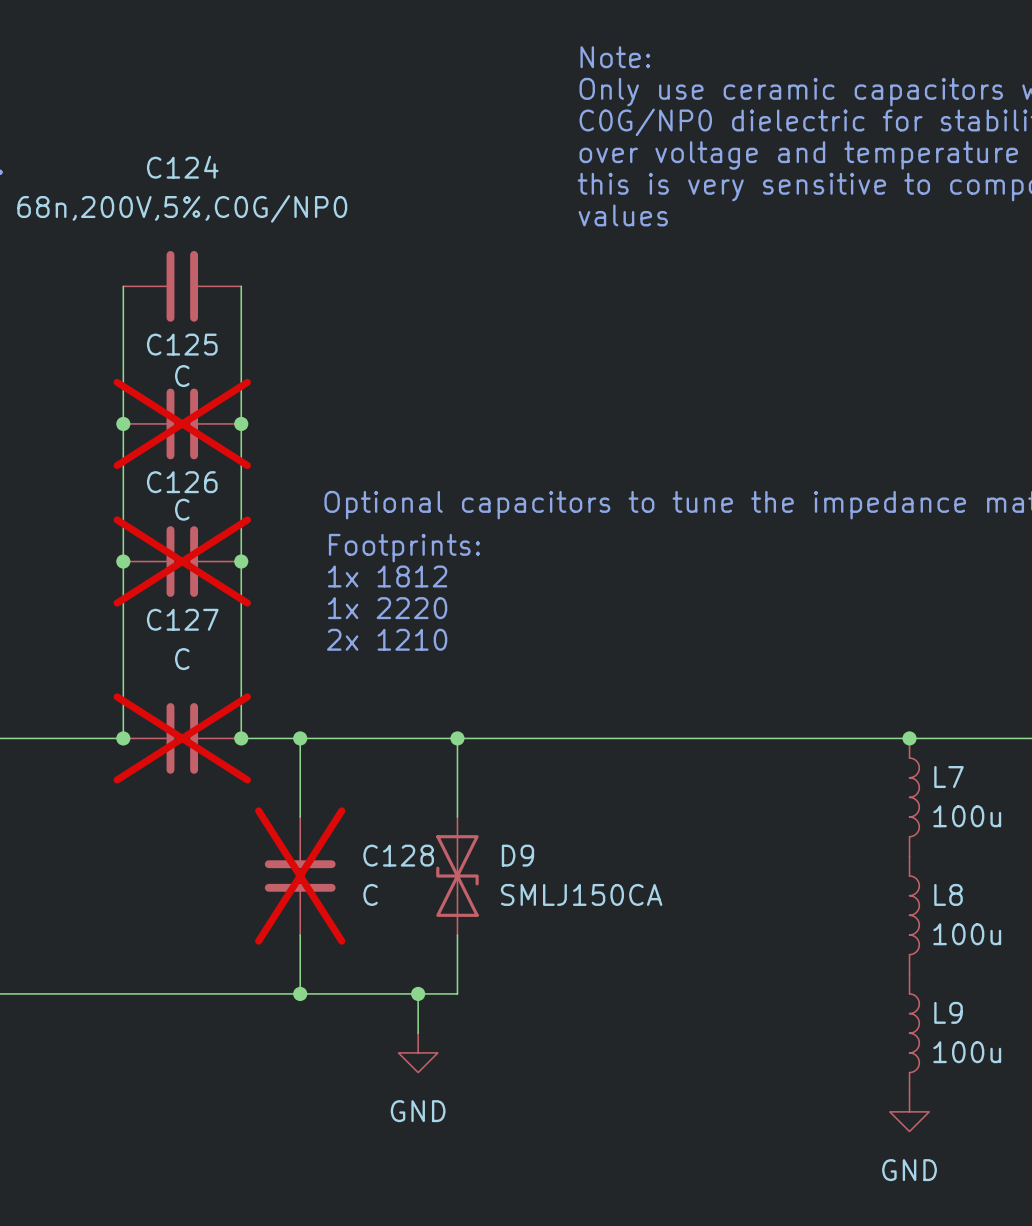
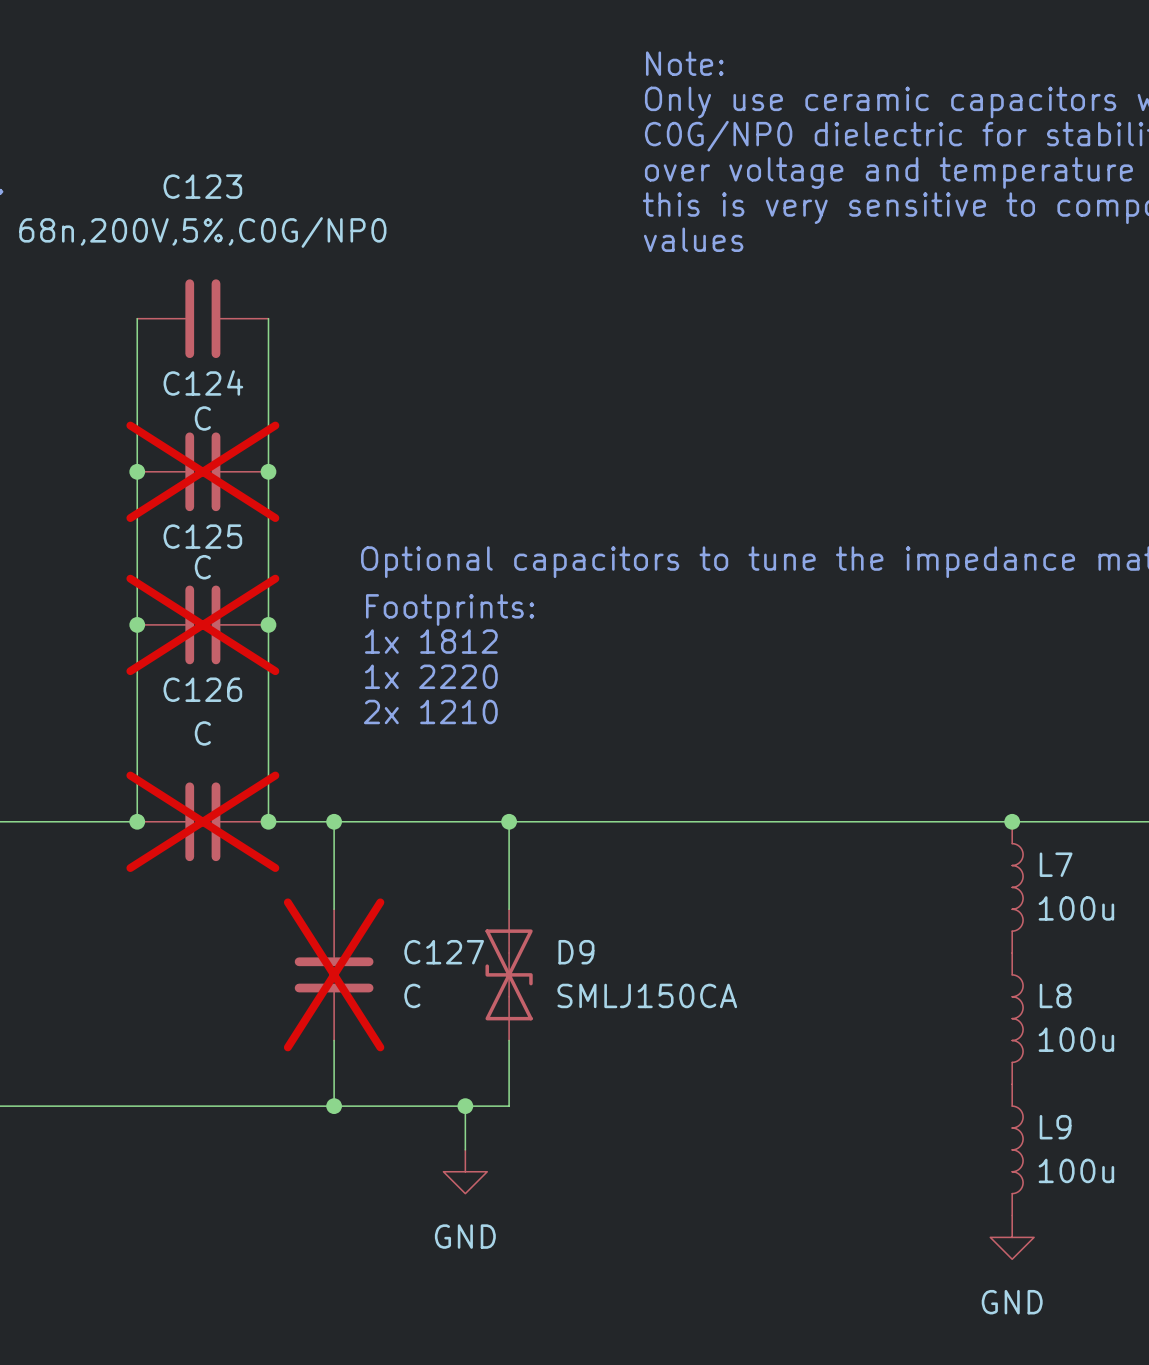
C124 name: C124 (182, 167) -> C123 (202, 186)
C125 name: C125 (182, 344) -> C124 (203, 382)
C126 name: C126 (182, 482) -> C125 (202, 536)
C127 name: C127 (182, 619) -> C126 (202, 689)
C128 name: C128 (398, 855) -> C127 (444, 952)

